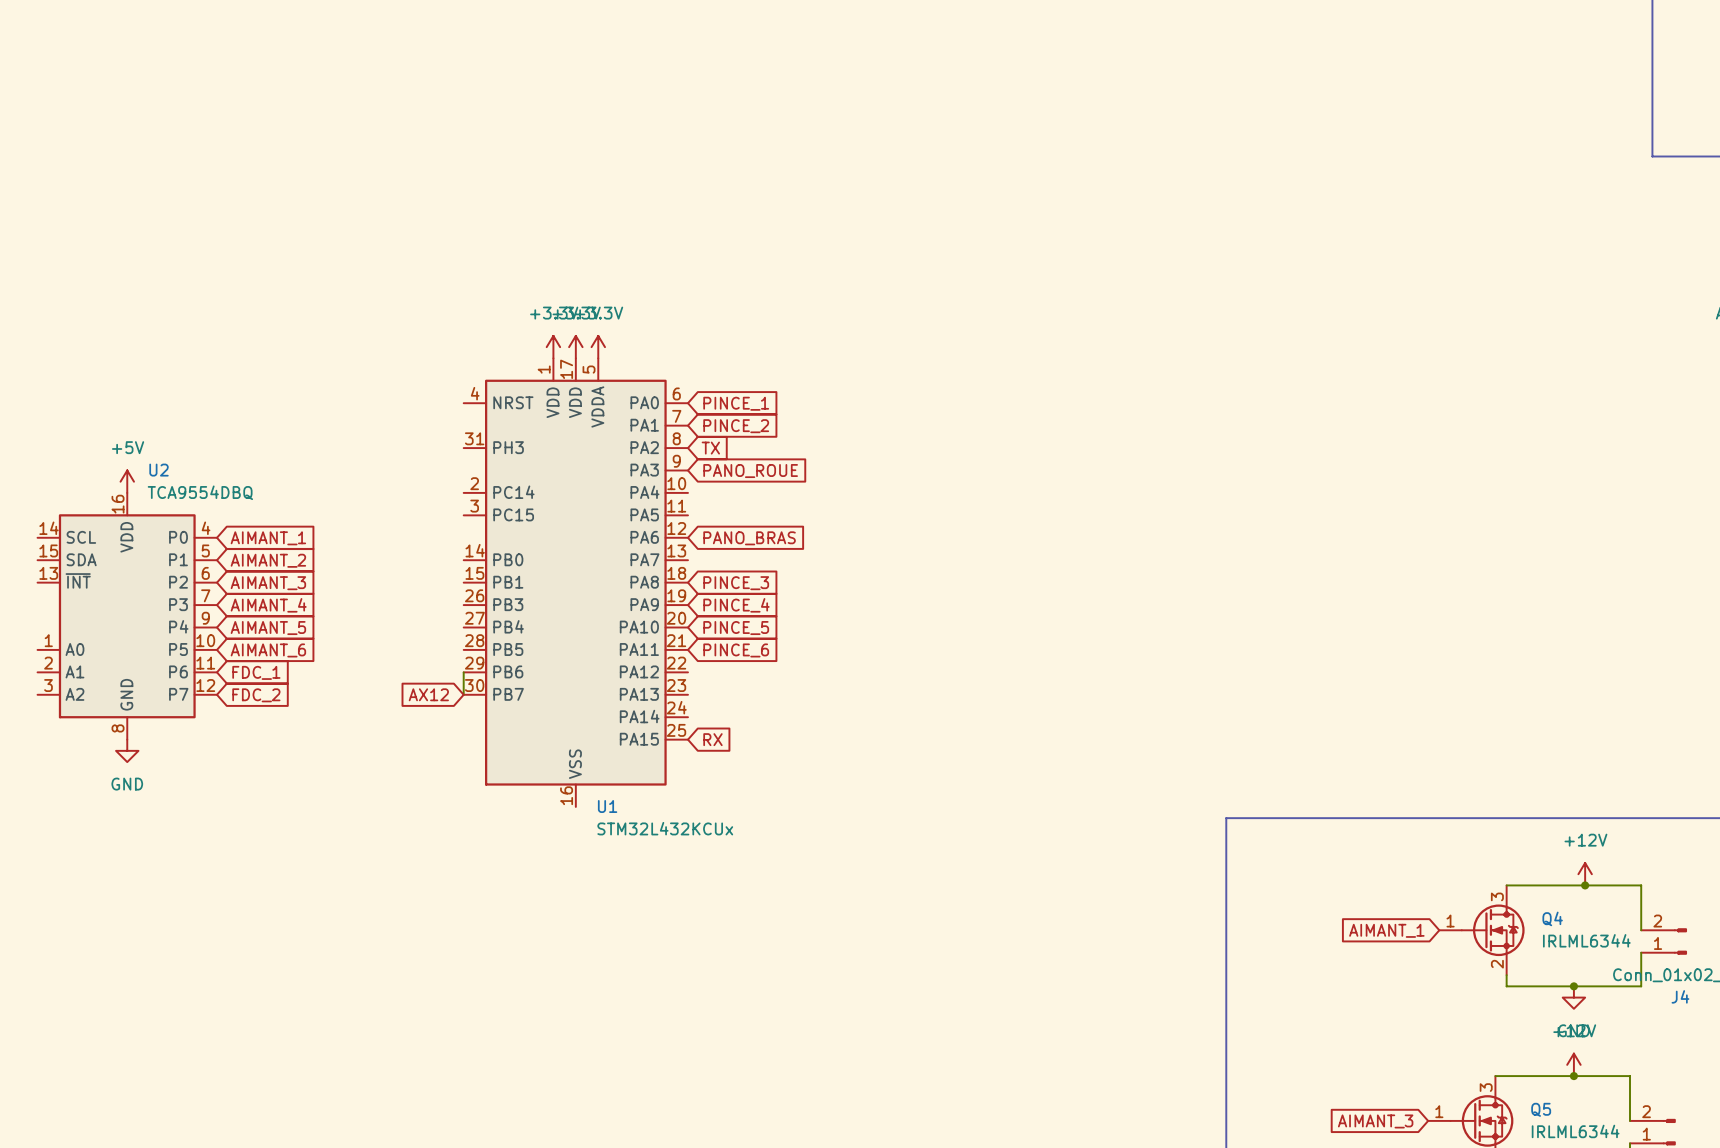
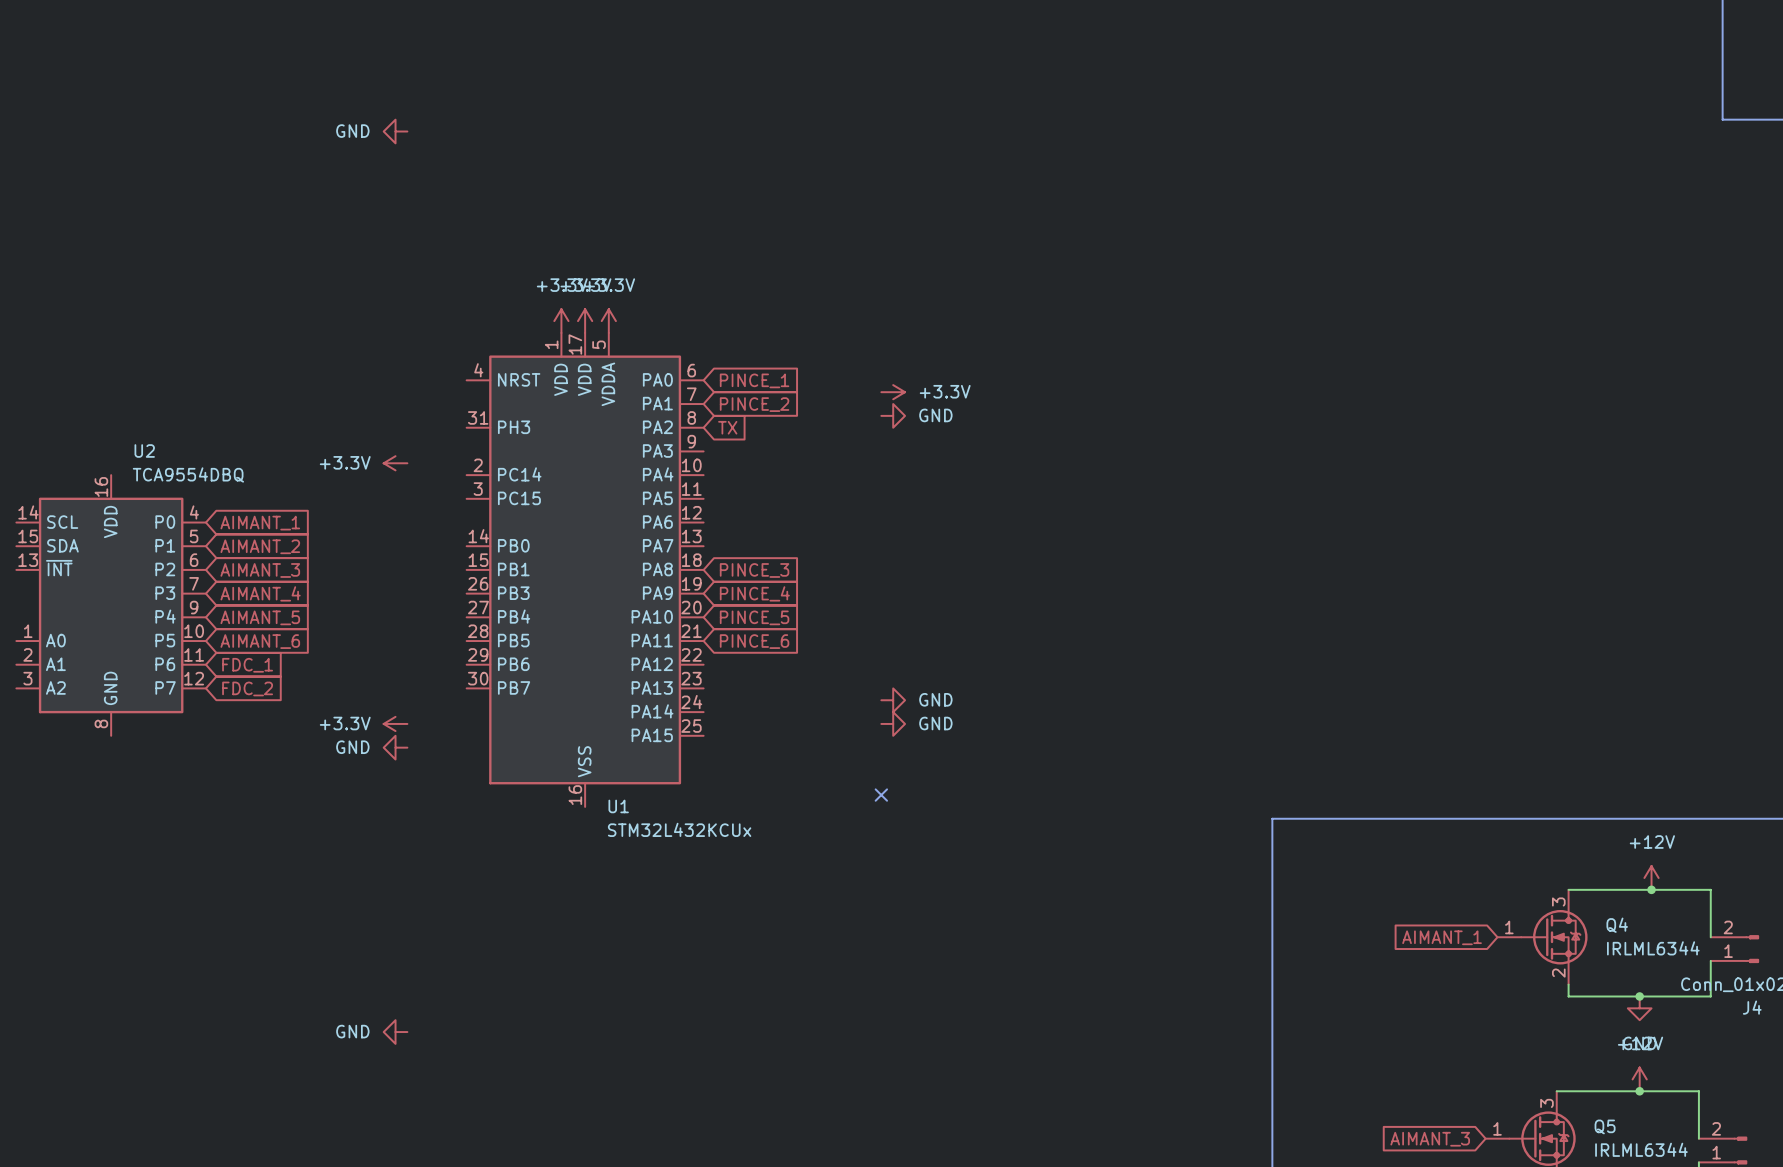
power symbol: none -> GND (395, 131)
power symbol: none -> +3.3V (893, 392)
power symbol: none -> GND (893, 415)
global label: PANO_ROUE (750, 471) -> none
power symbol: +5V (127, 481) -> none
power symbol: none -> +3.3V (395, 463)
global label: PANO_BRAS (749, 538) -> none
wire: (463, 672) (463, 694) -> none
global label: AX12 (428, 694) -> none
power symbol: none -> GND (893, 700)
power symbol: none -> +3.3V (395, 723)
power symbol: none -> GND (893, 723)
global label: RX (712, 739) -> none
power symbol: GND (127, 750) -> none
power symbol: none -> GND (395, 747)
no-connect mark: none -> (881, 795)
power symbol: none -> GND (395, 1032)

